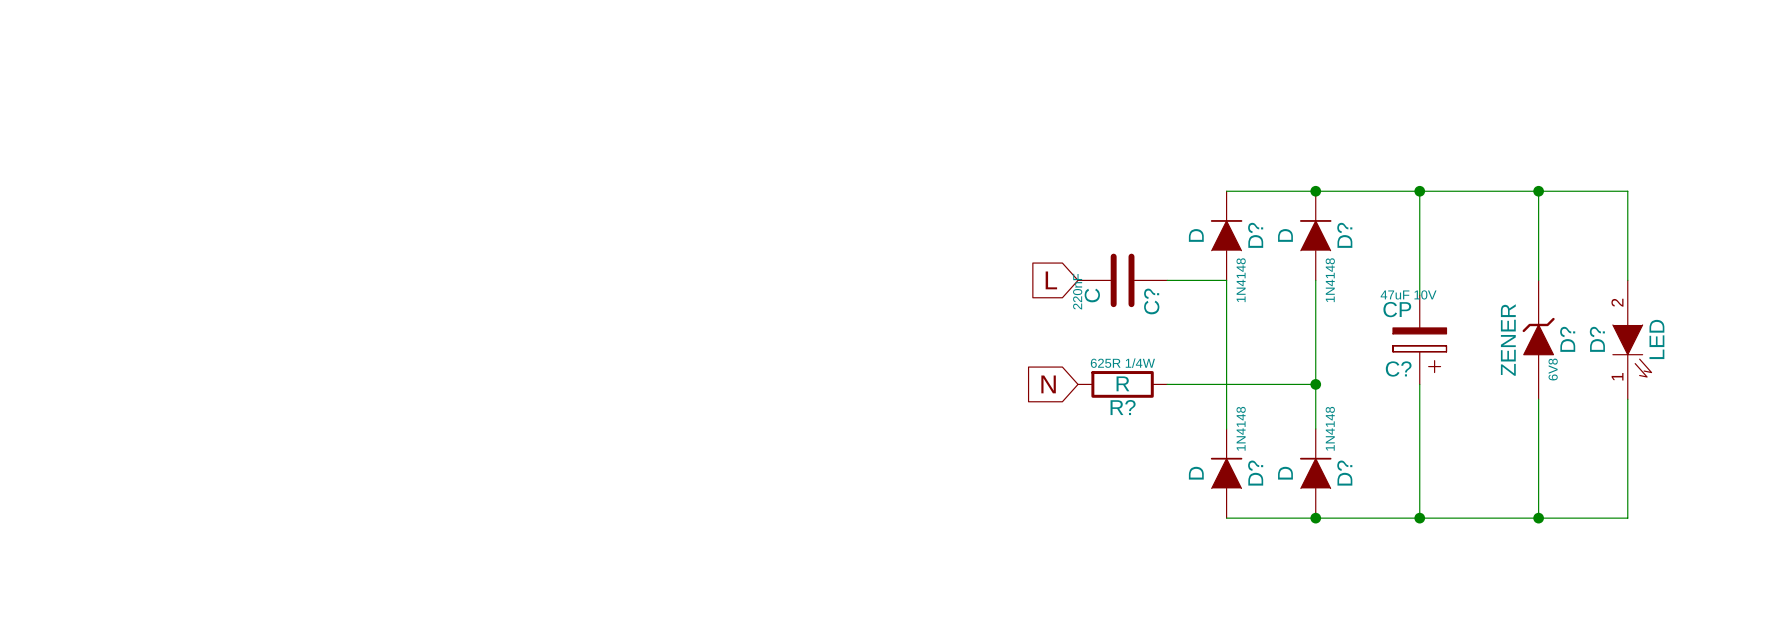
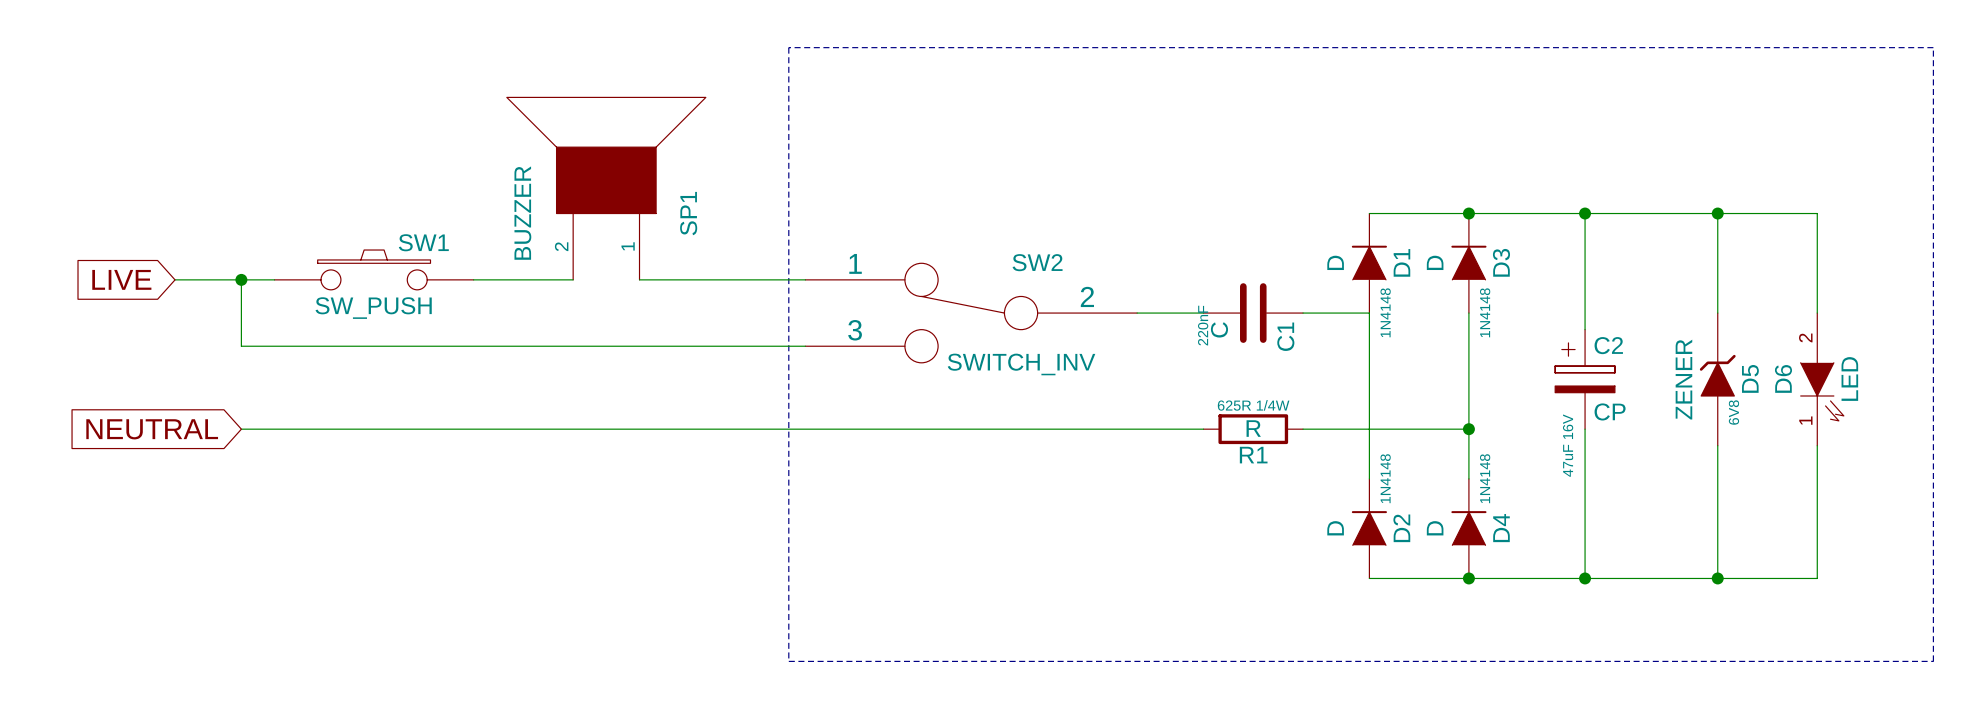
line: none -> (788, 47) (788, 661) (1933, 661) (1933, 47) (788, 47)
SP1: none -> BUZZER (606, 188)
D? name: D? (1255, 235) -> D1 (1401, 262)
D? name: D? (1344, 235) -> D3 (1501, 262)
SW1: none -> SW_PUSH (374, 269)
global label: none -> LIVE (121, 279)
wire: none -> (175, 279) (274, 279)
wire: none -> (241, 279) (241, 346) (805, 346)
junction: none -> (241, 279)
wire: none -> (473, 279) (573, 279)
wire: none -> (639, 279) (805, 279)
SW2: none -> SWITCH_INV (971, 313)
wire: none -> (1137, 313) (1203, 313)
global label: L (1051, 280) -> none
C? name: C? (1151, 301) -> C1 (1285, 336)
C?: CP (1419, 339) -> none
C2: none -> CP (1585, 379)
D? name: D? (1567, 339) -> D5 (1750, 378)
D? name: D? (1597, 339) -> D6 (1783, 378)
global label: none -> NEUTRAL (152, 429)
wire: none -> (241, 429) (1203, 429)
global label: N (1048, 384) -> none
R? name: R? (1123, 407) -> R1 (1253, 455)
D? name: D? (1255, 473) -> D2 (1401, 528)
D? name: D? (1344, 473) -> D4 (1501, 528)

